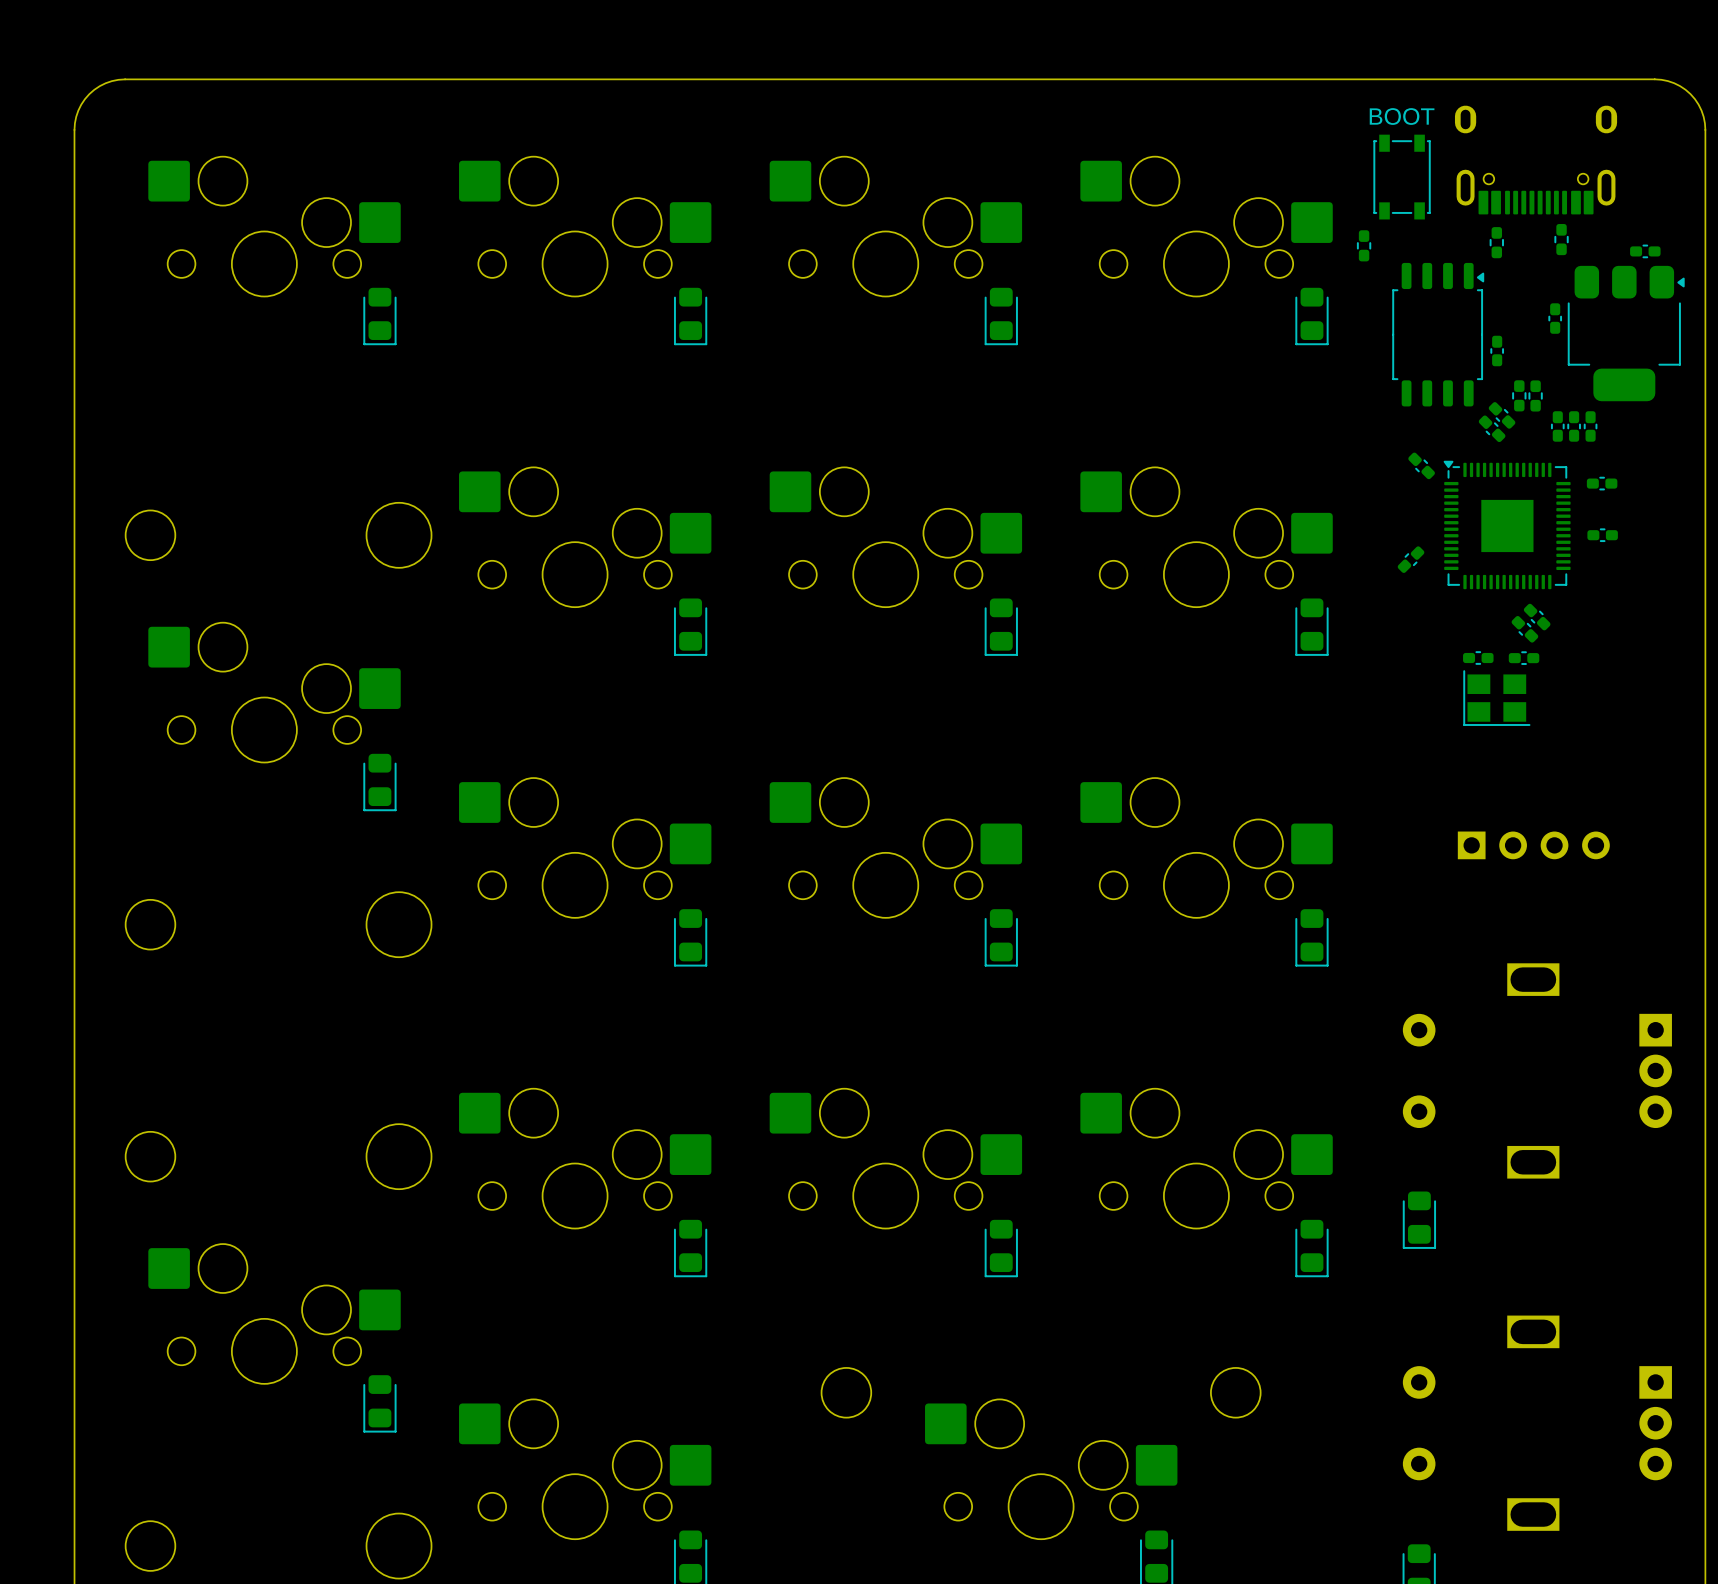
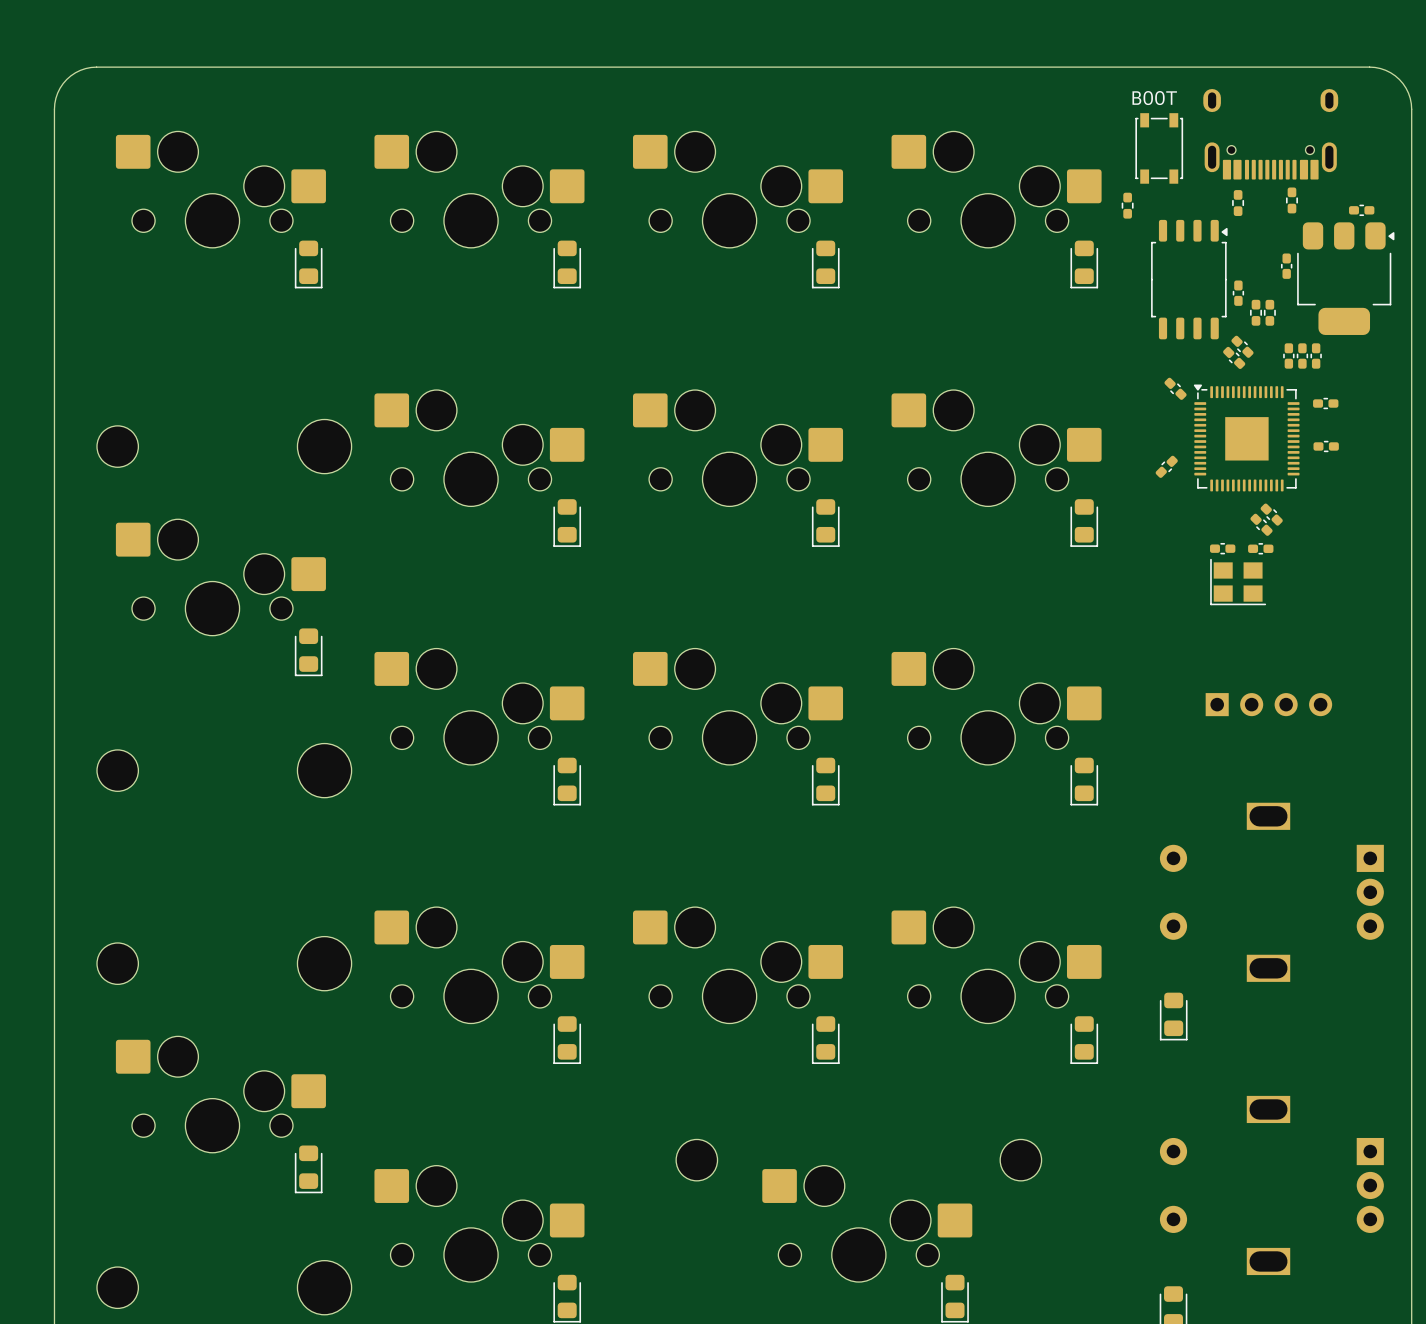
part: none -> (1256, 312)
part: none -> (1269, 312)
part: (1519, 395) -> none
part: (1535, 395) -> none

